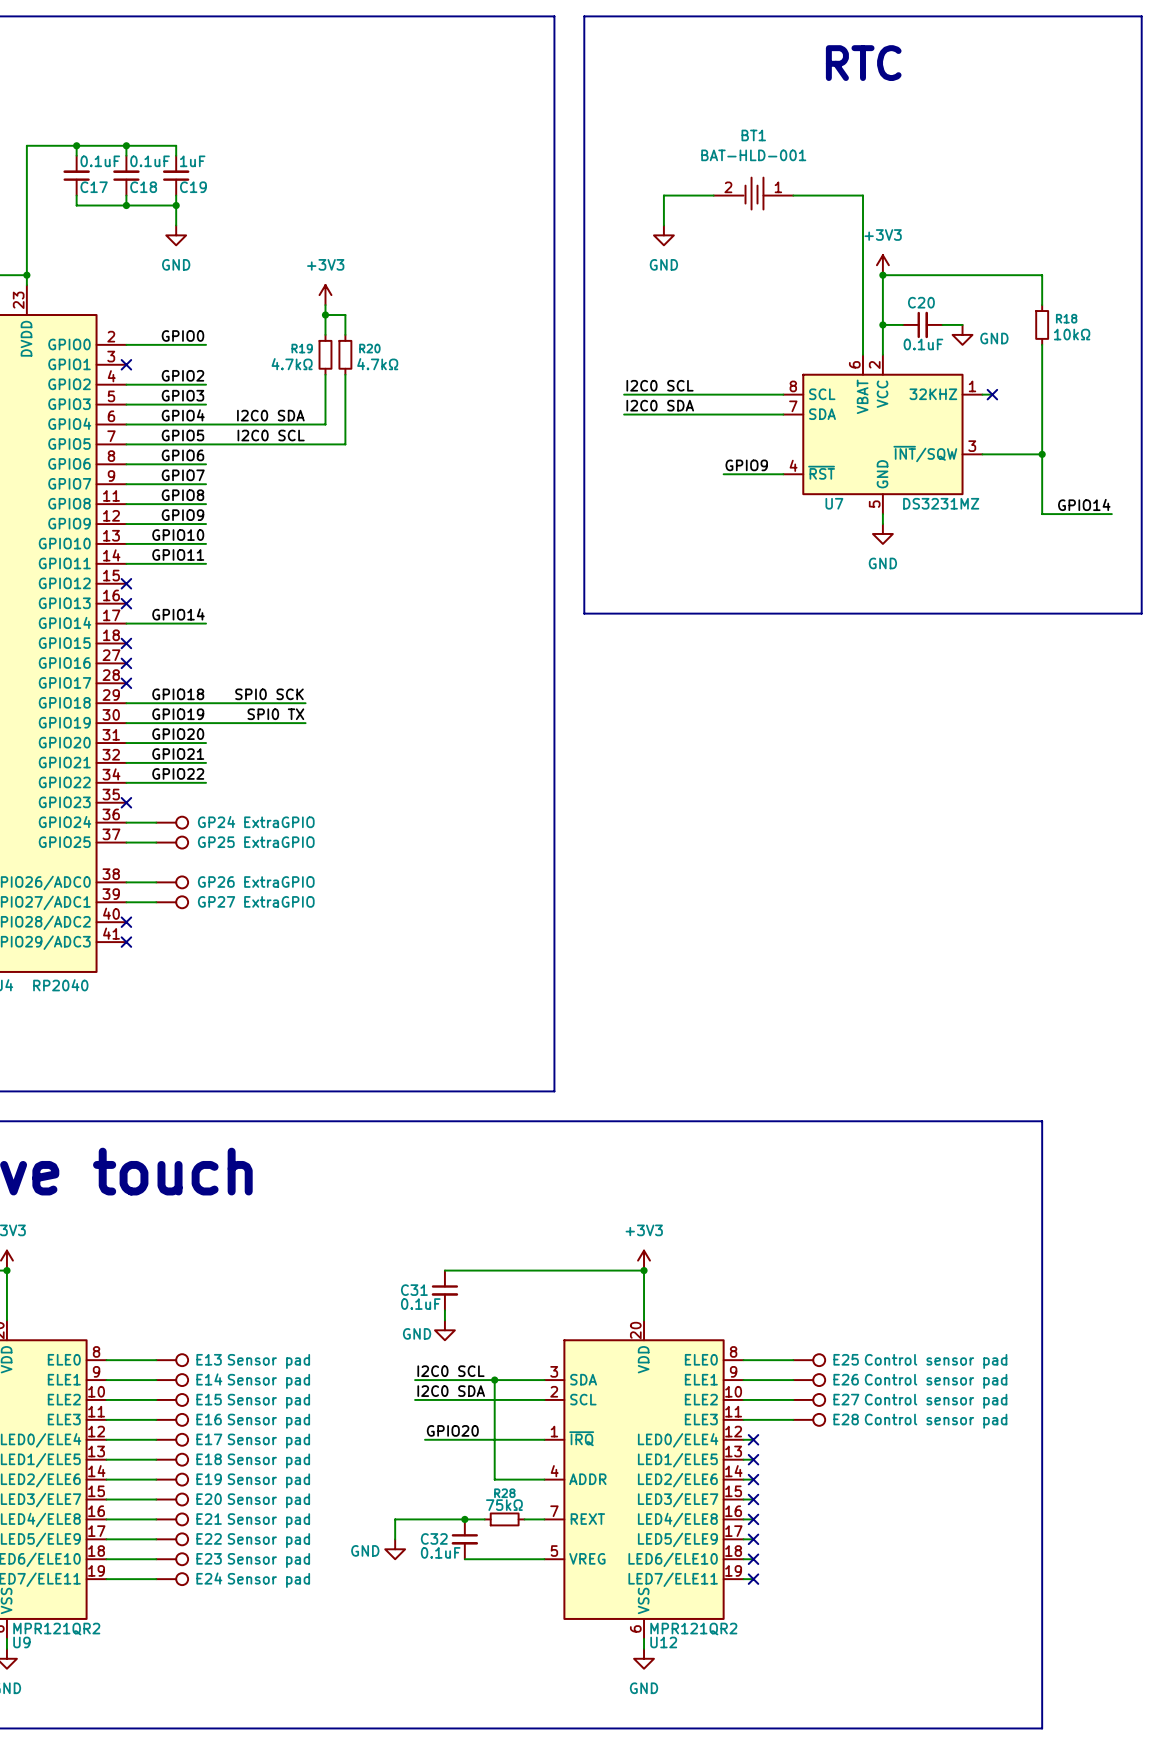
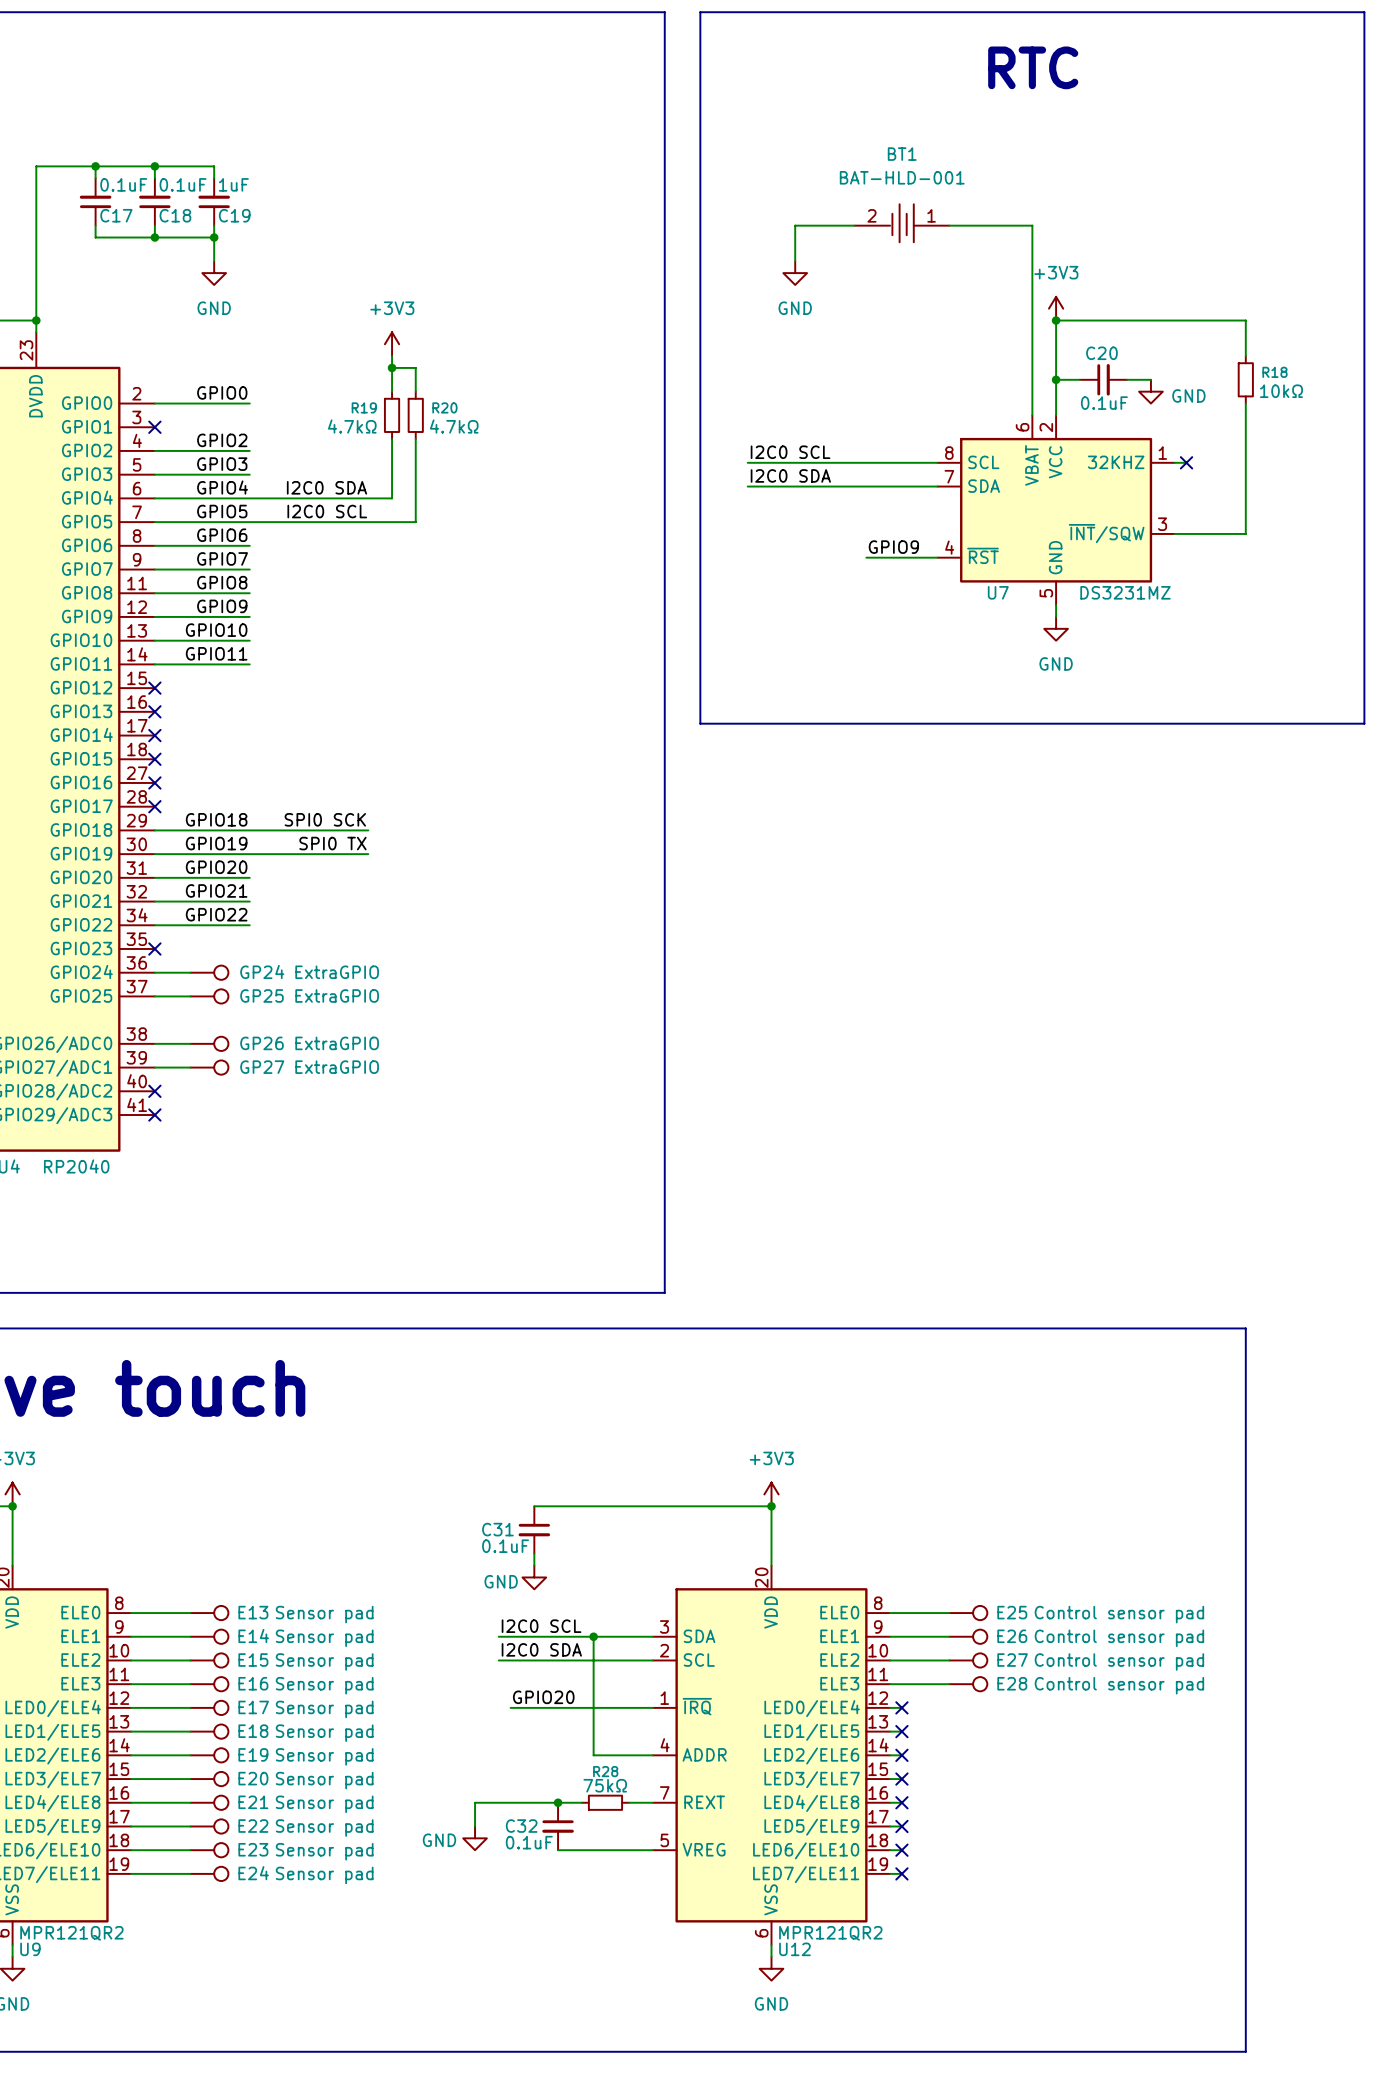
wire: (1042, 454) (1042, 514) (1111, 514) -> none
junction: (1042, 454) -> none
label: GPIO14 (1084, 504) -> none
label: GPIO14 (178, 614) -> none
wire: (126, 623) (206, 623) -> none
no-connect mark: none -> (154, 735)

